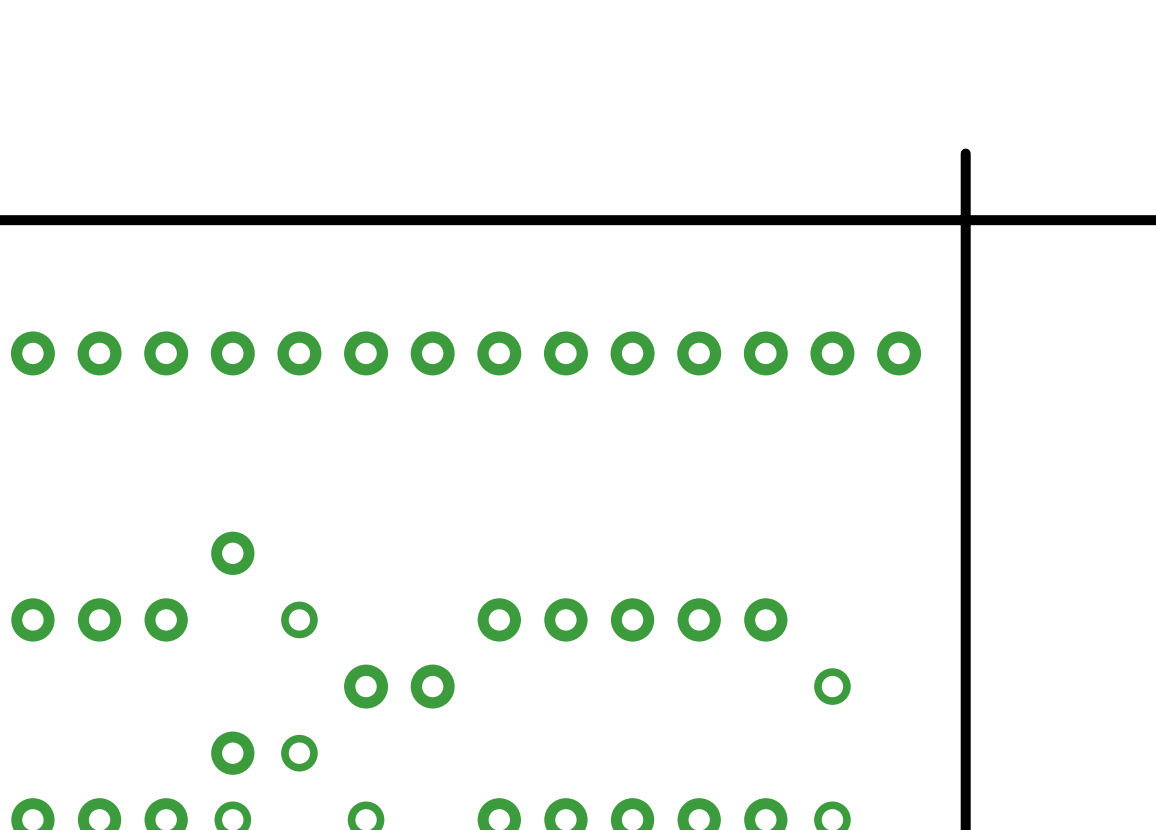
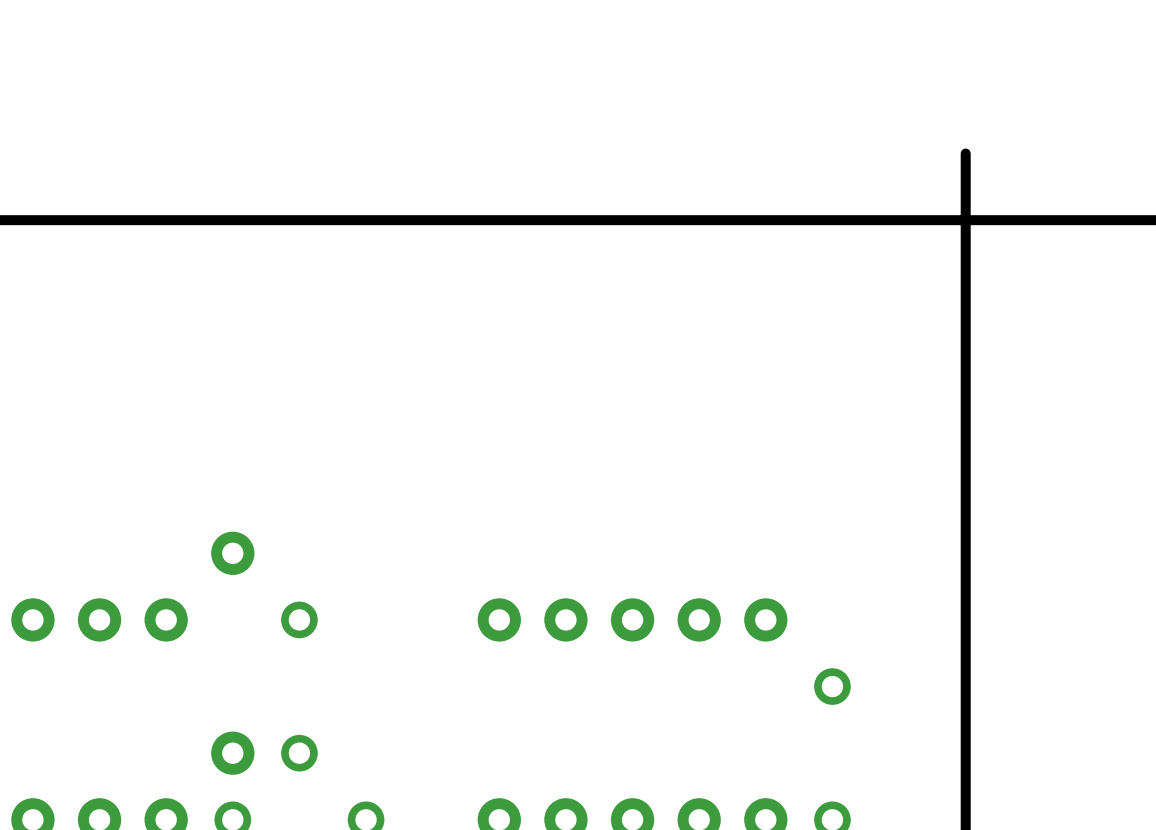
part: (66, 353) -> none
part: (199, 353) -> none
part: (332, 353) -> none
part: (465, 353) -> none
part: (599, 353) -> none
part: (732, 353) -> none
part: (865, 353) -> none
part: (399, 686) -> none

